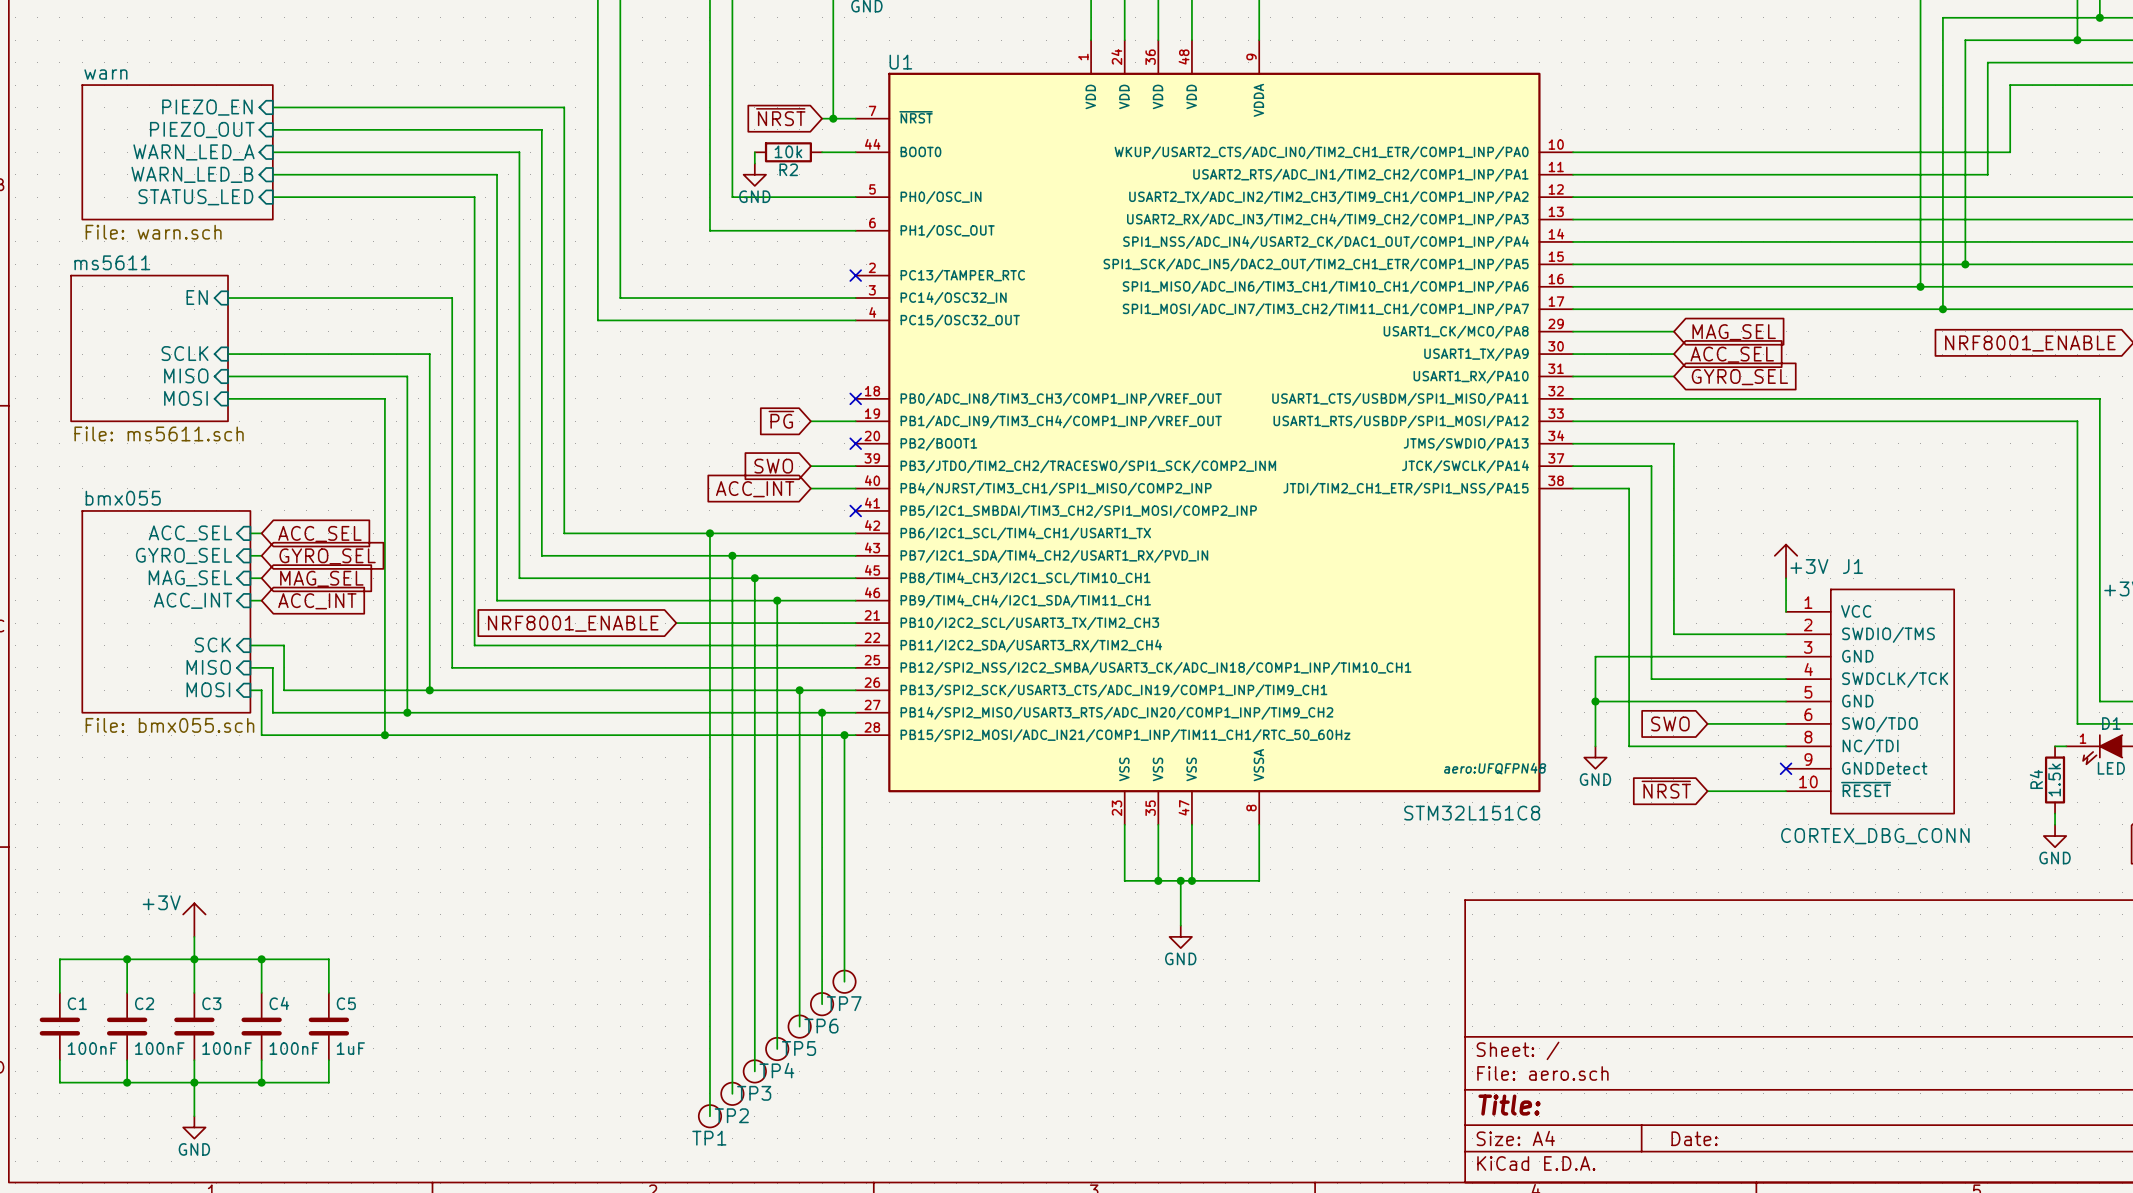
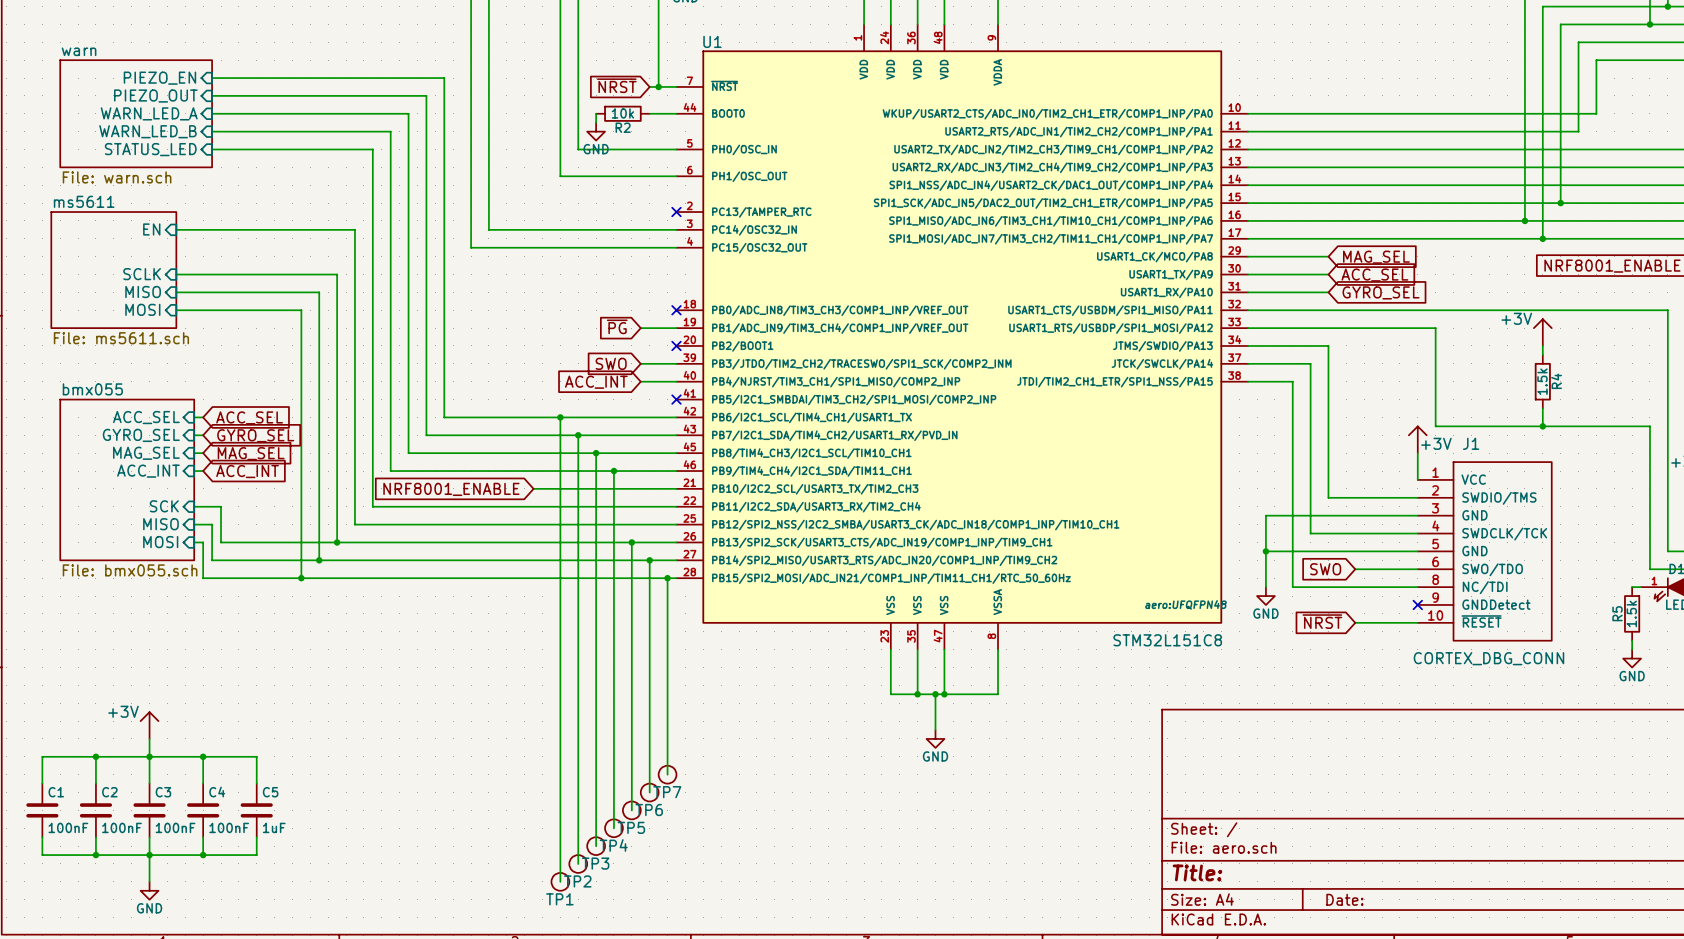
wire: (1808, 421) (2077, 421) (2077, 544) -> (1435, 328) (1435, 426) (1649, 426)
power symbol: none -> +3V (1542, 332)
wire: none -> (1542, 345) (1542, 354)
R4: none -> 1.5k (1542, 381)
wire: none -> (1542, 408) (1542, 426)
junction: none -> (1542, 426)
R4 name: R4 (2036, 779) -> R5 (1617, 613)

